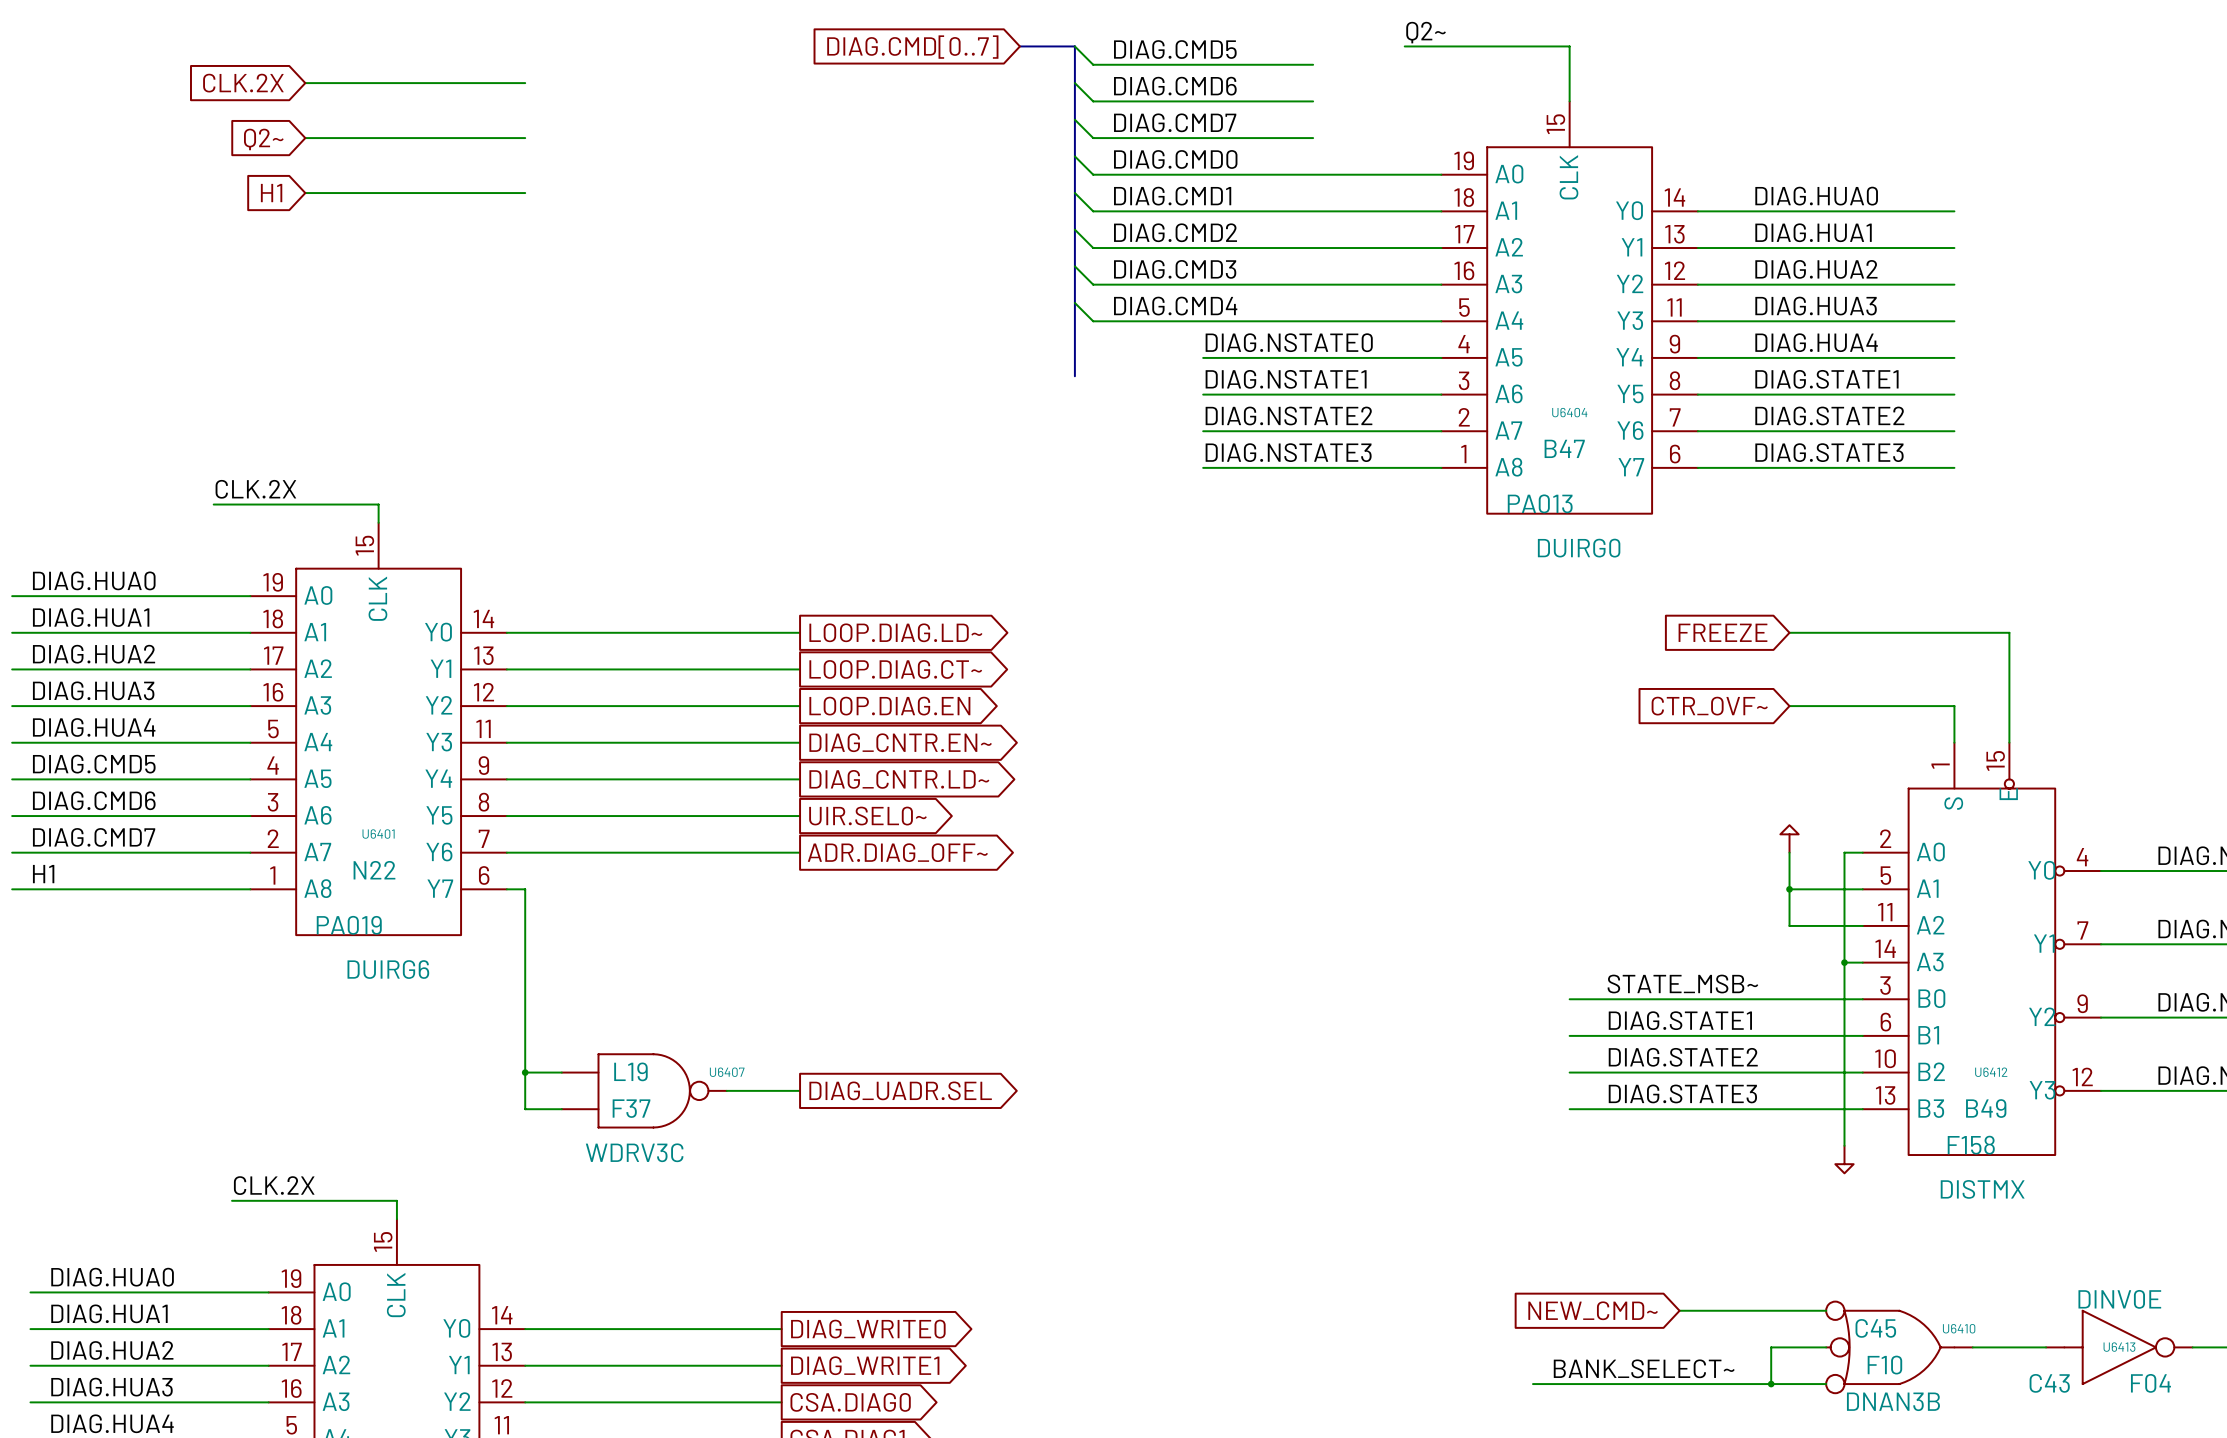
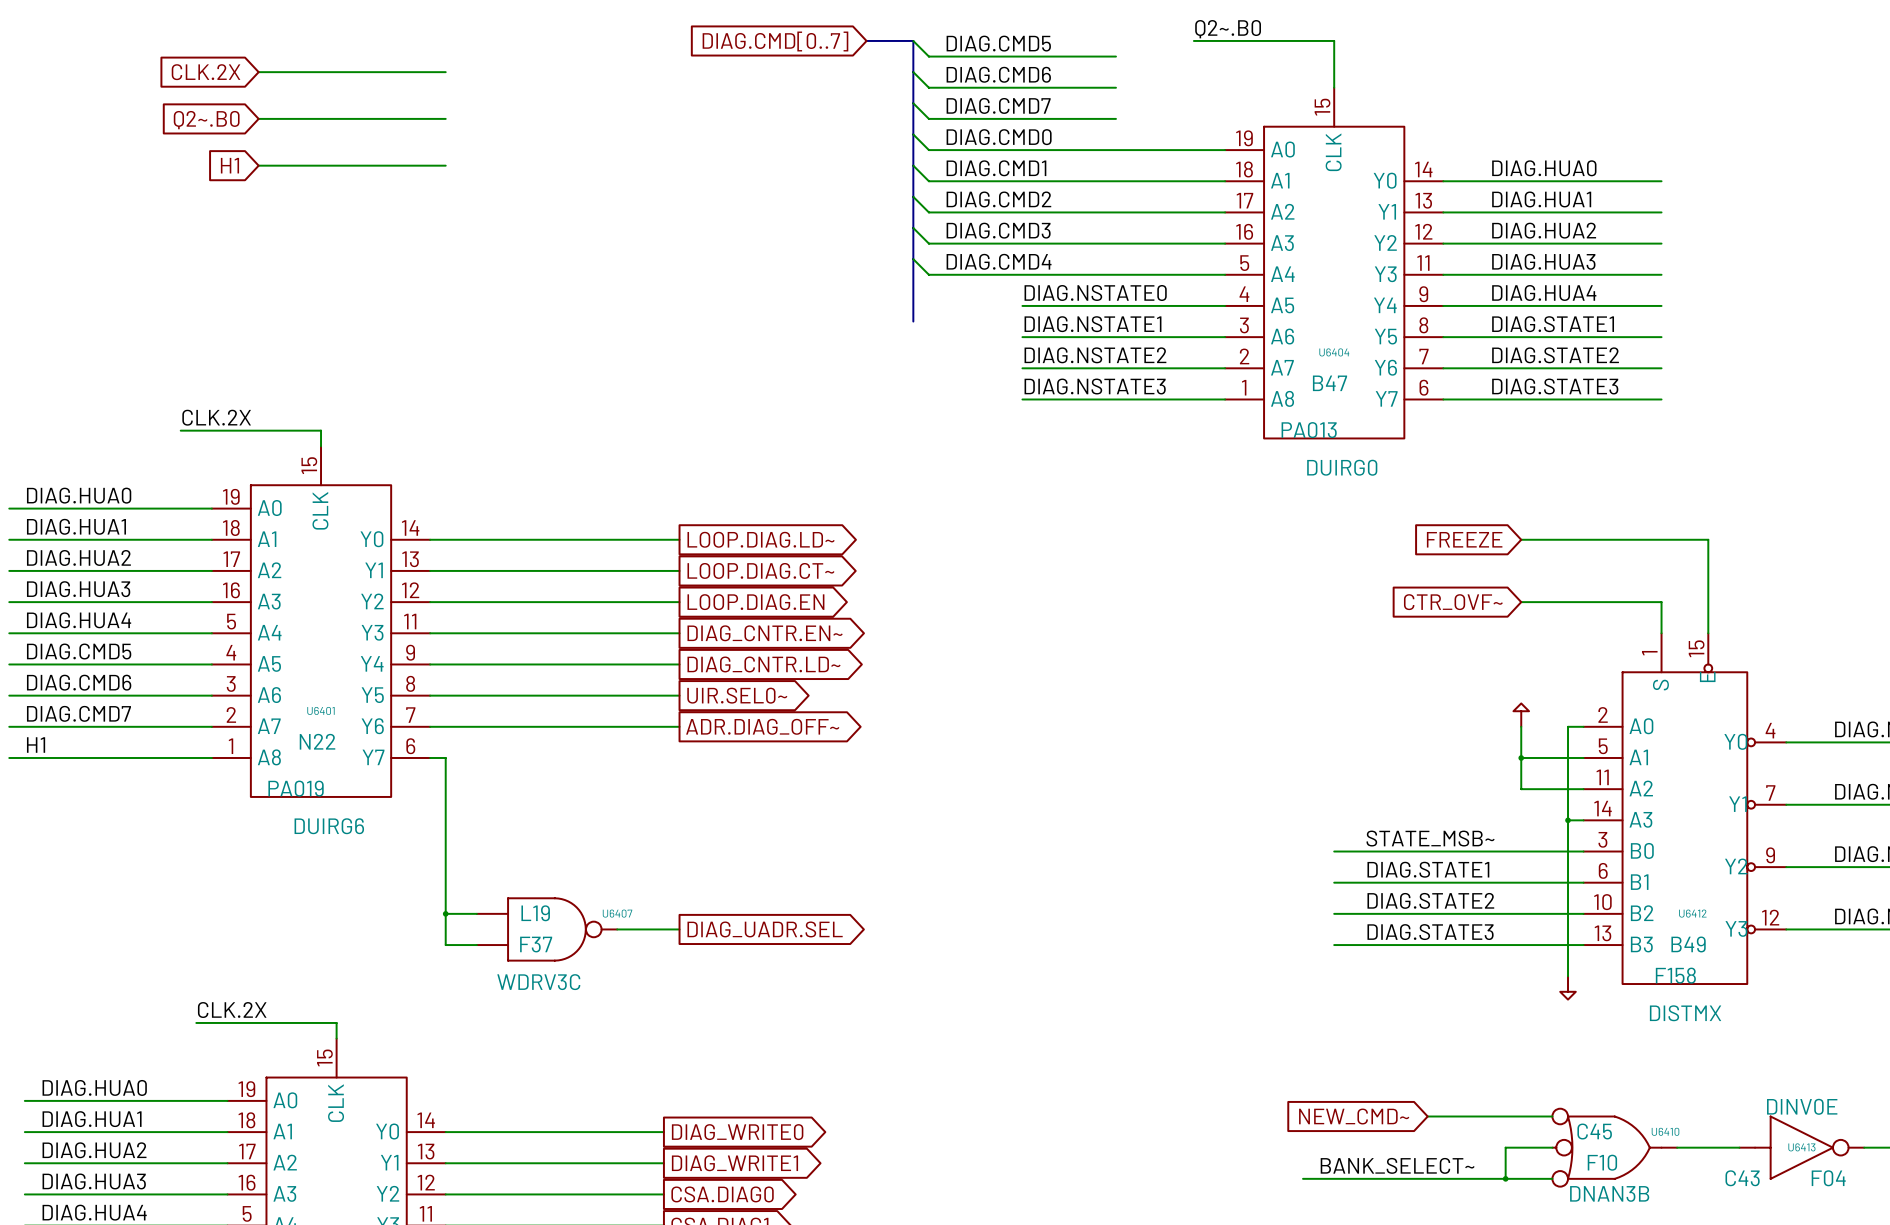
label: Q2~ (1426, 32) -> Q2~.B0 (1228, 29)
global label: Q2~ (263, 139) -> Q2~.B0 (206, 120)

